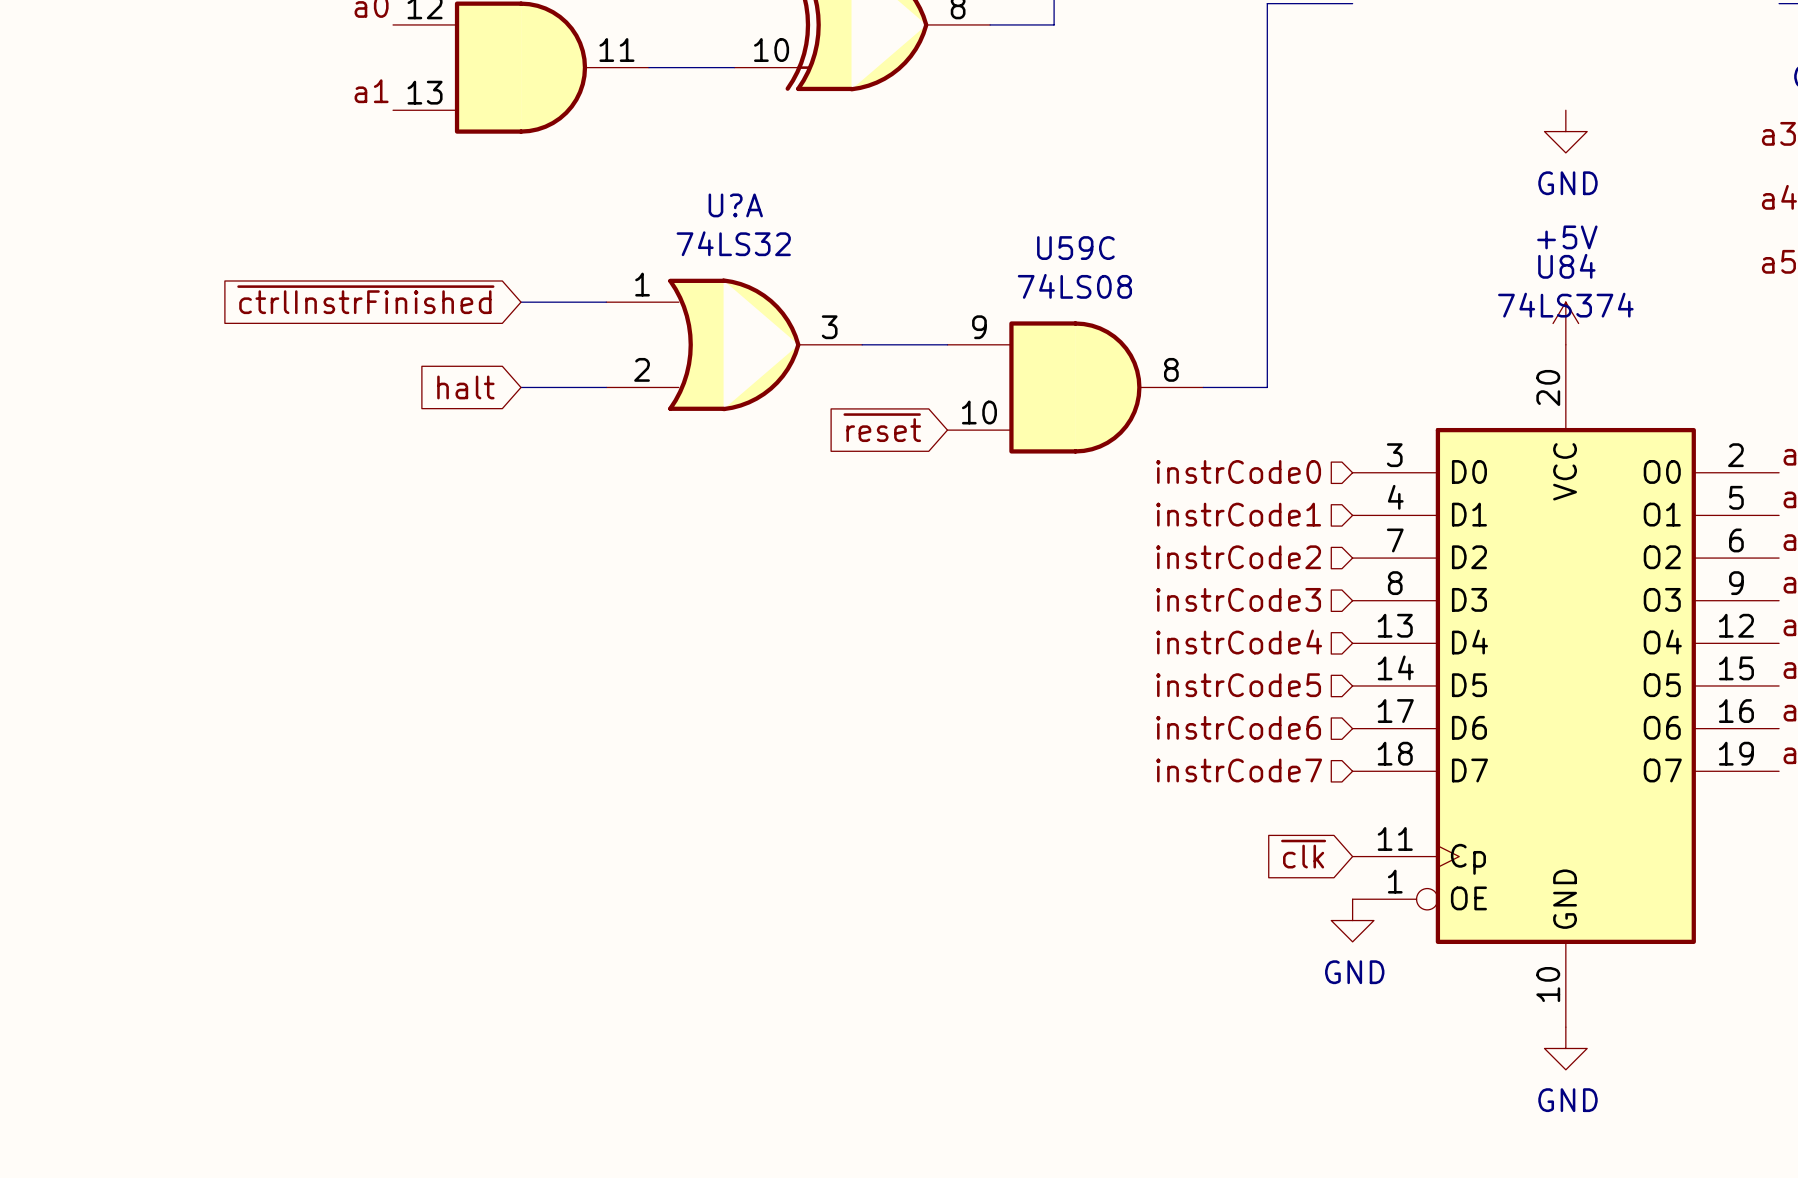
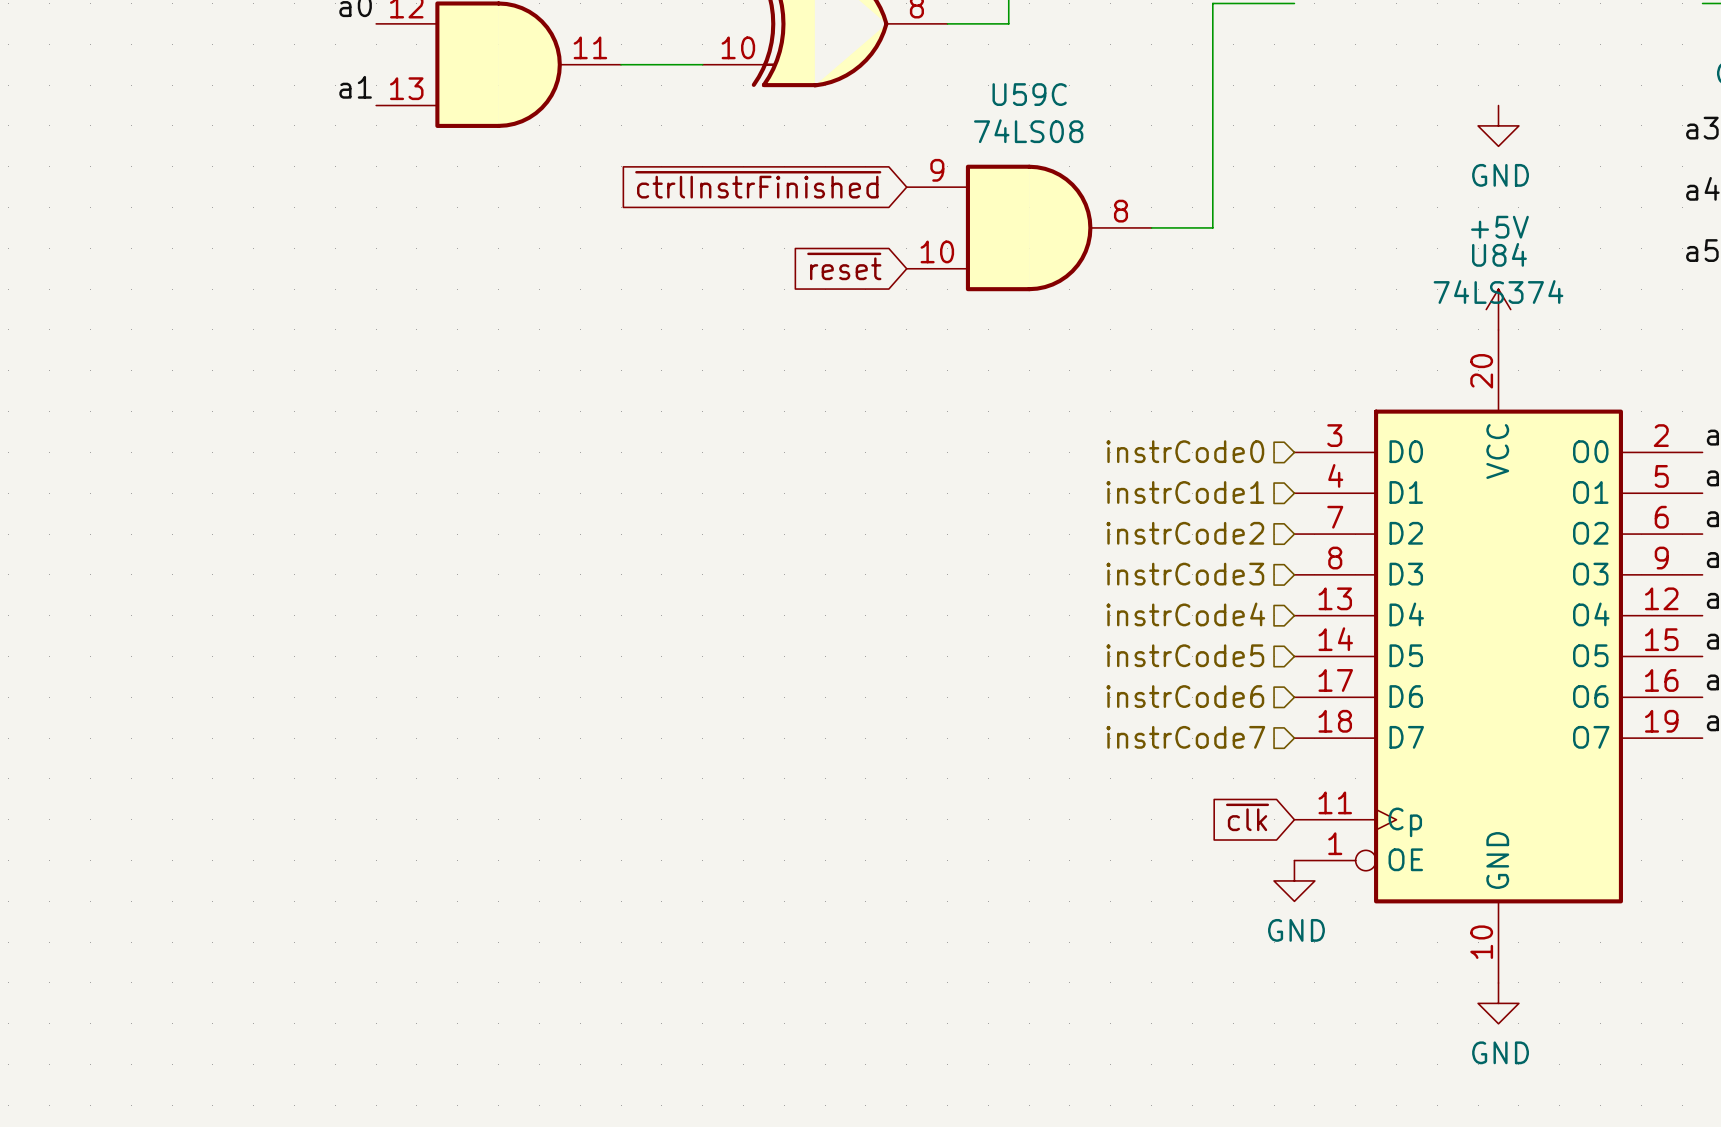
global label: none -> ~{ctrlInstrFinished} (758, 184)
wire: (1267, 238) (1267, 387) (1203, 387) -> (1212, 227) (1151, 227)
global label: ~{ctrlInstrFinished} (365, 299) -> none
wire: (521, 302) (606, 302) -> none
U?A: 74LS32 (734, 344) -> none
wire: (862, 344) (947, 344) -> none
global label: halt (465, 387) -> none
wire: (521, 387) (606, 387) -> none
U59C position: (1075, 387) -> (1029, 227)
global label position: ~{reset} (882, 427) -> ~{reset} (844, 266)

